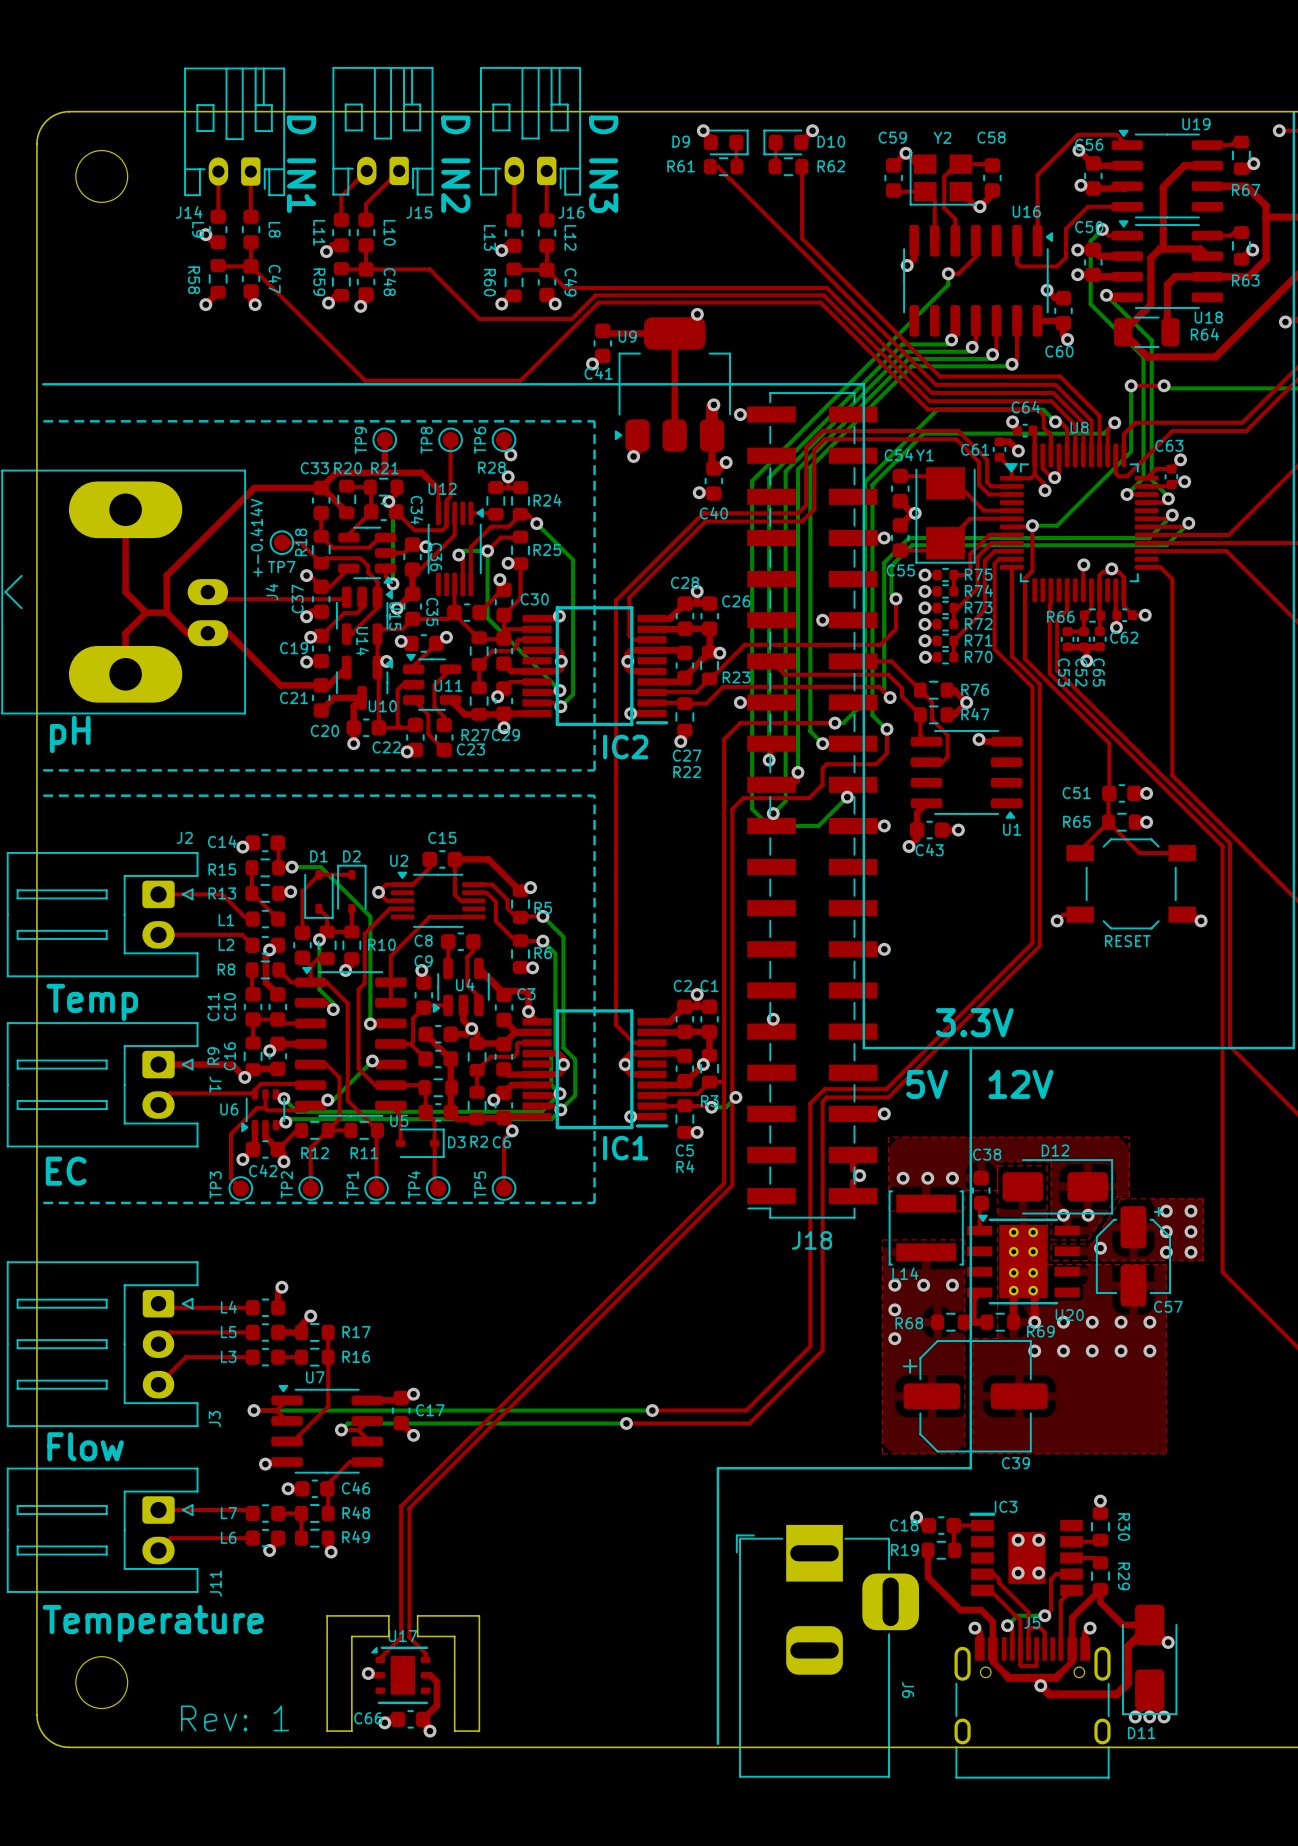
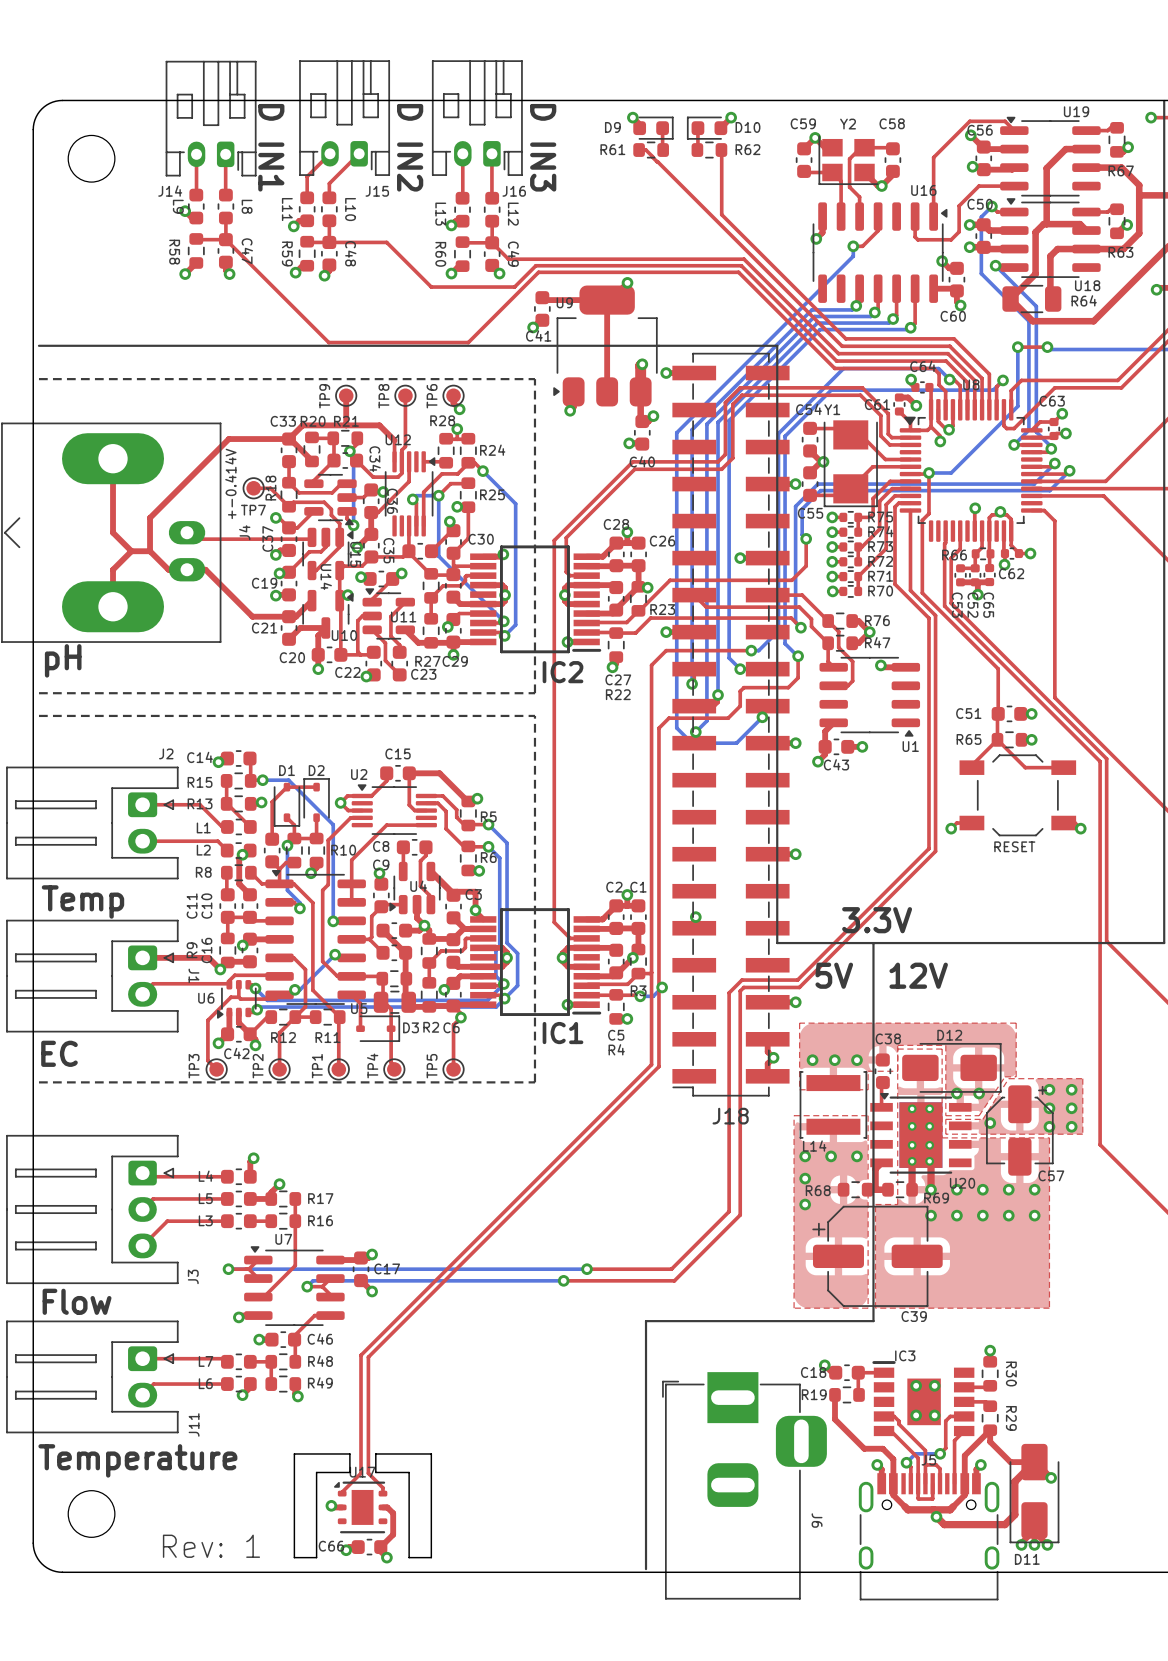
part footprint: [418, 1103, 459, 1122] -> [373, 990, 417, 1014]

